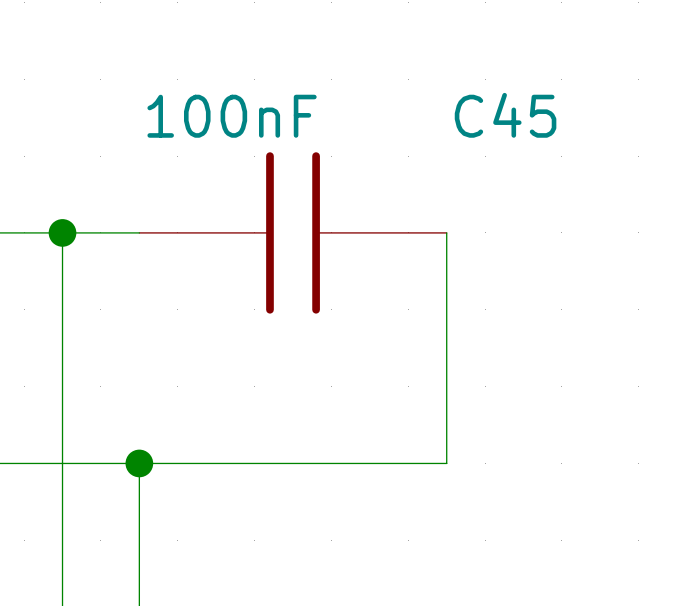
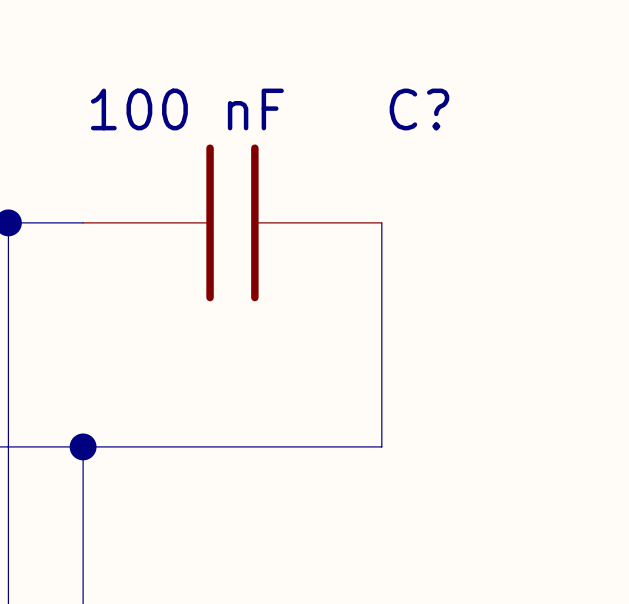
C45 name: C45 (505, 115) -> C? (419, 109)
C45 value: 100nF (232, 116) -> 100 nF (187, 109)

